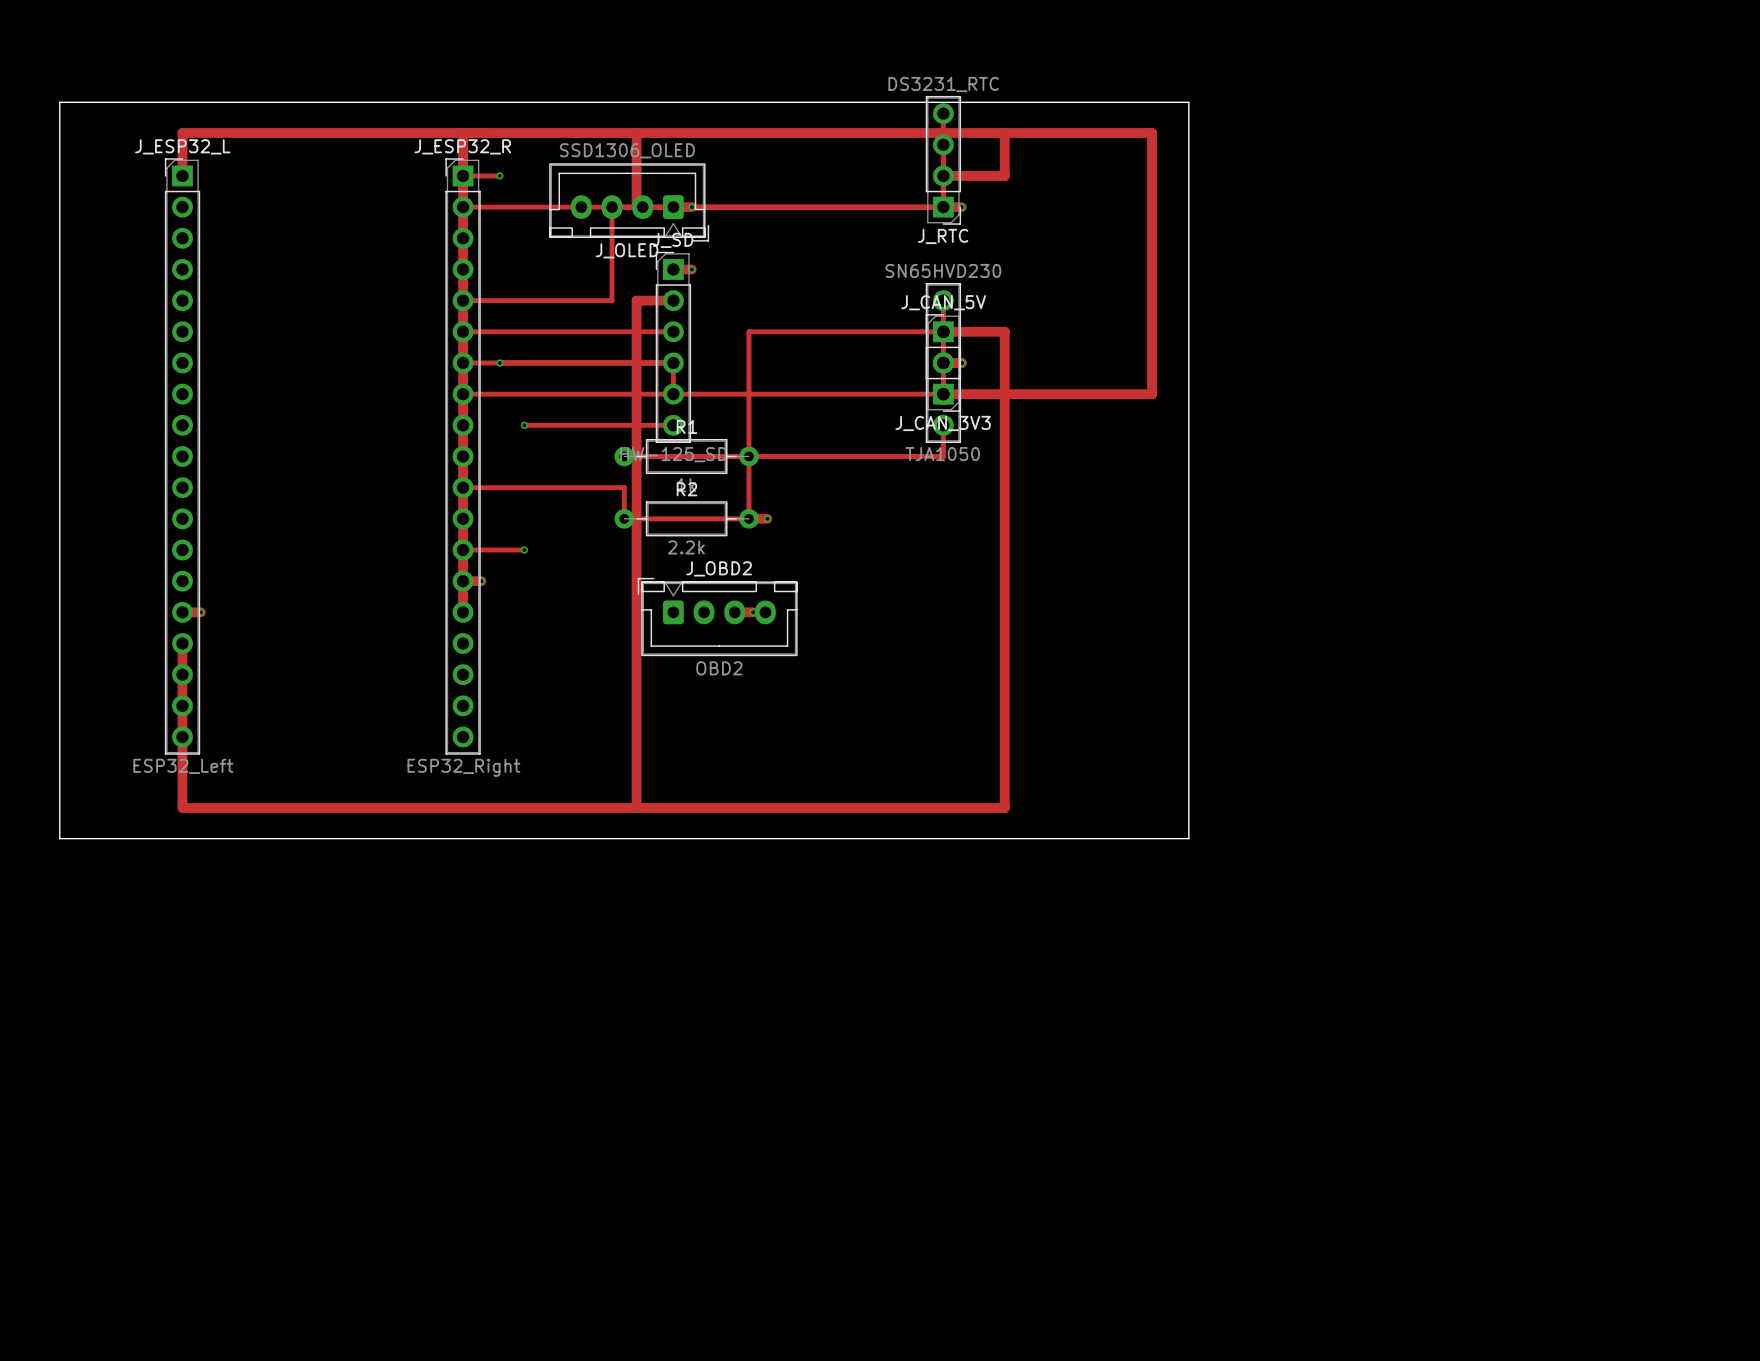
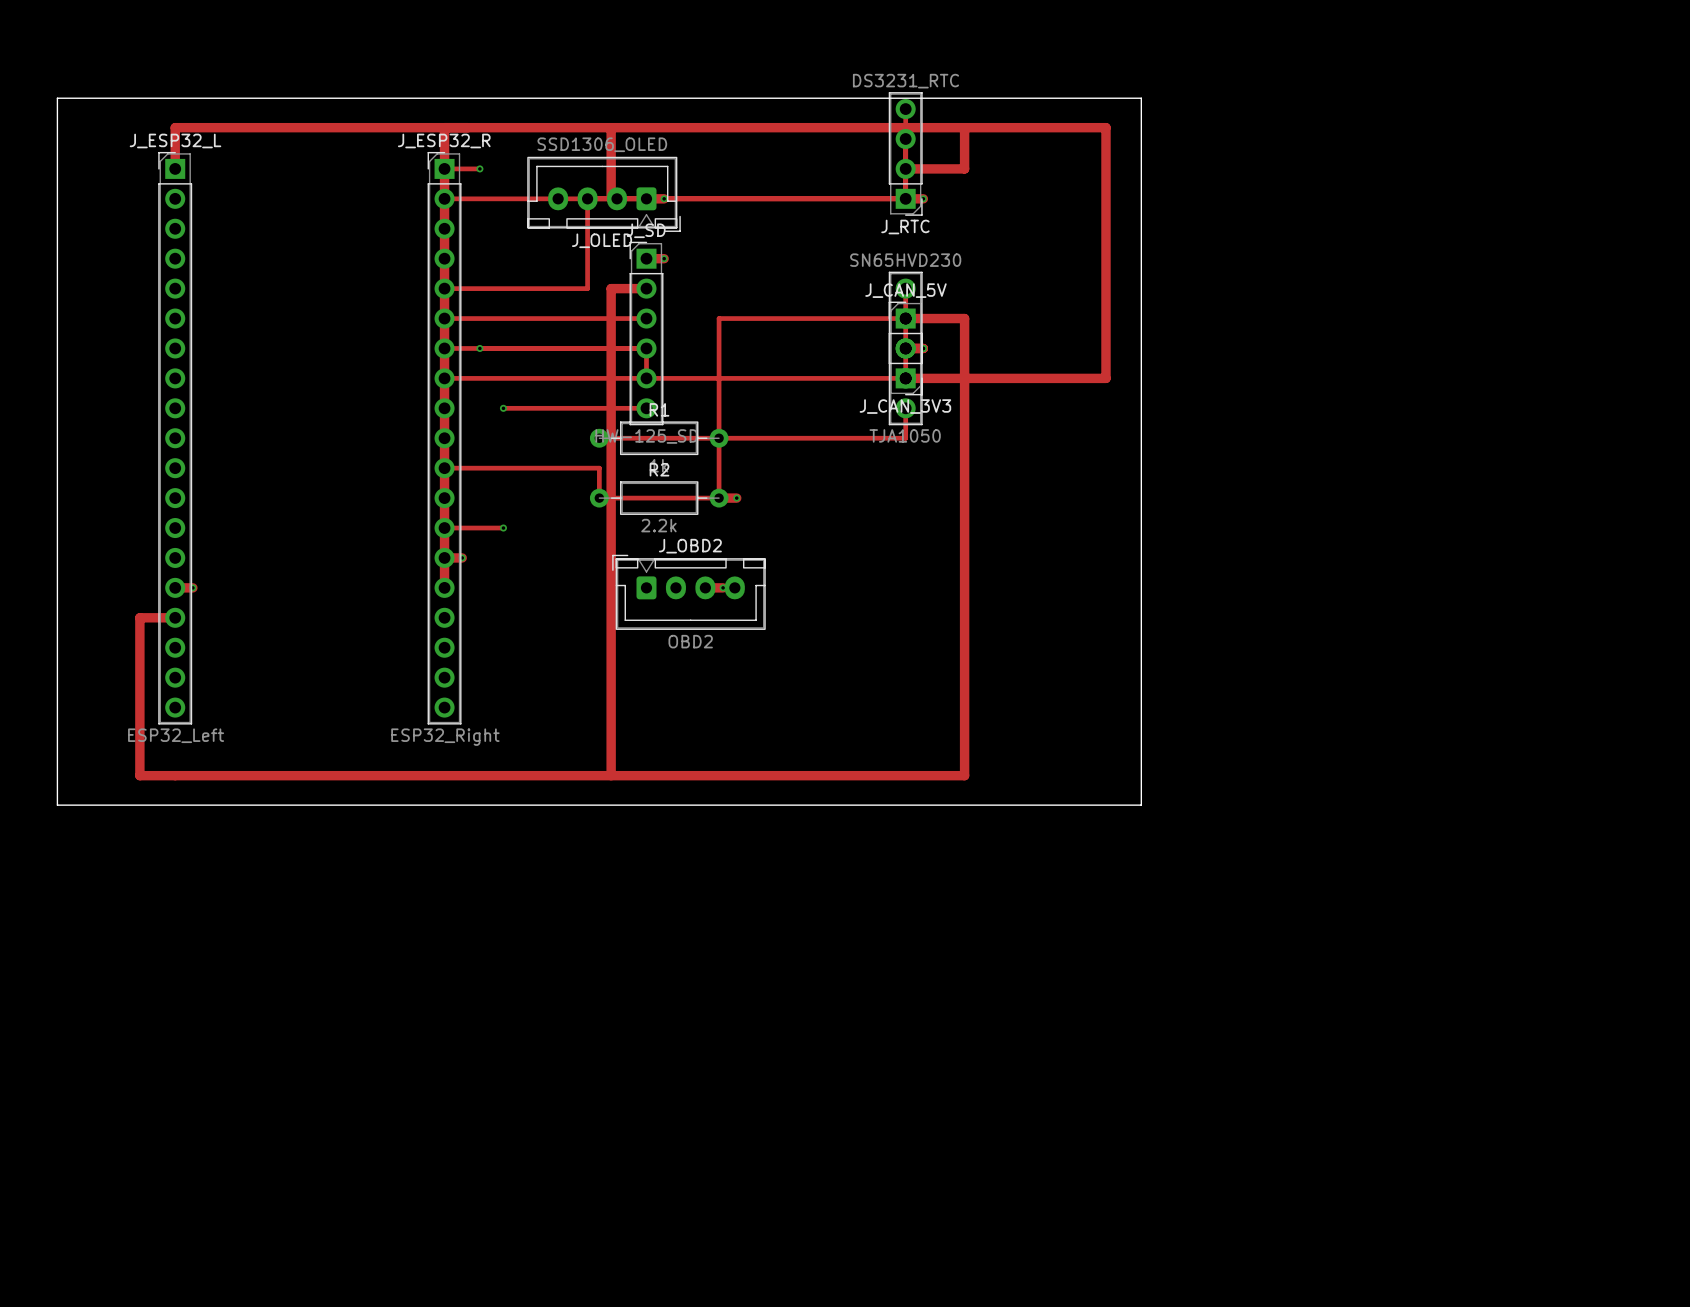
track: (182, 643) (182, 807) -> (175, 617) (139, 617) (139, 775) (175, 775)

